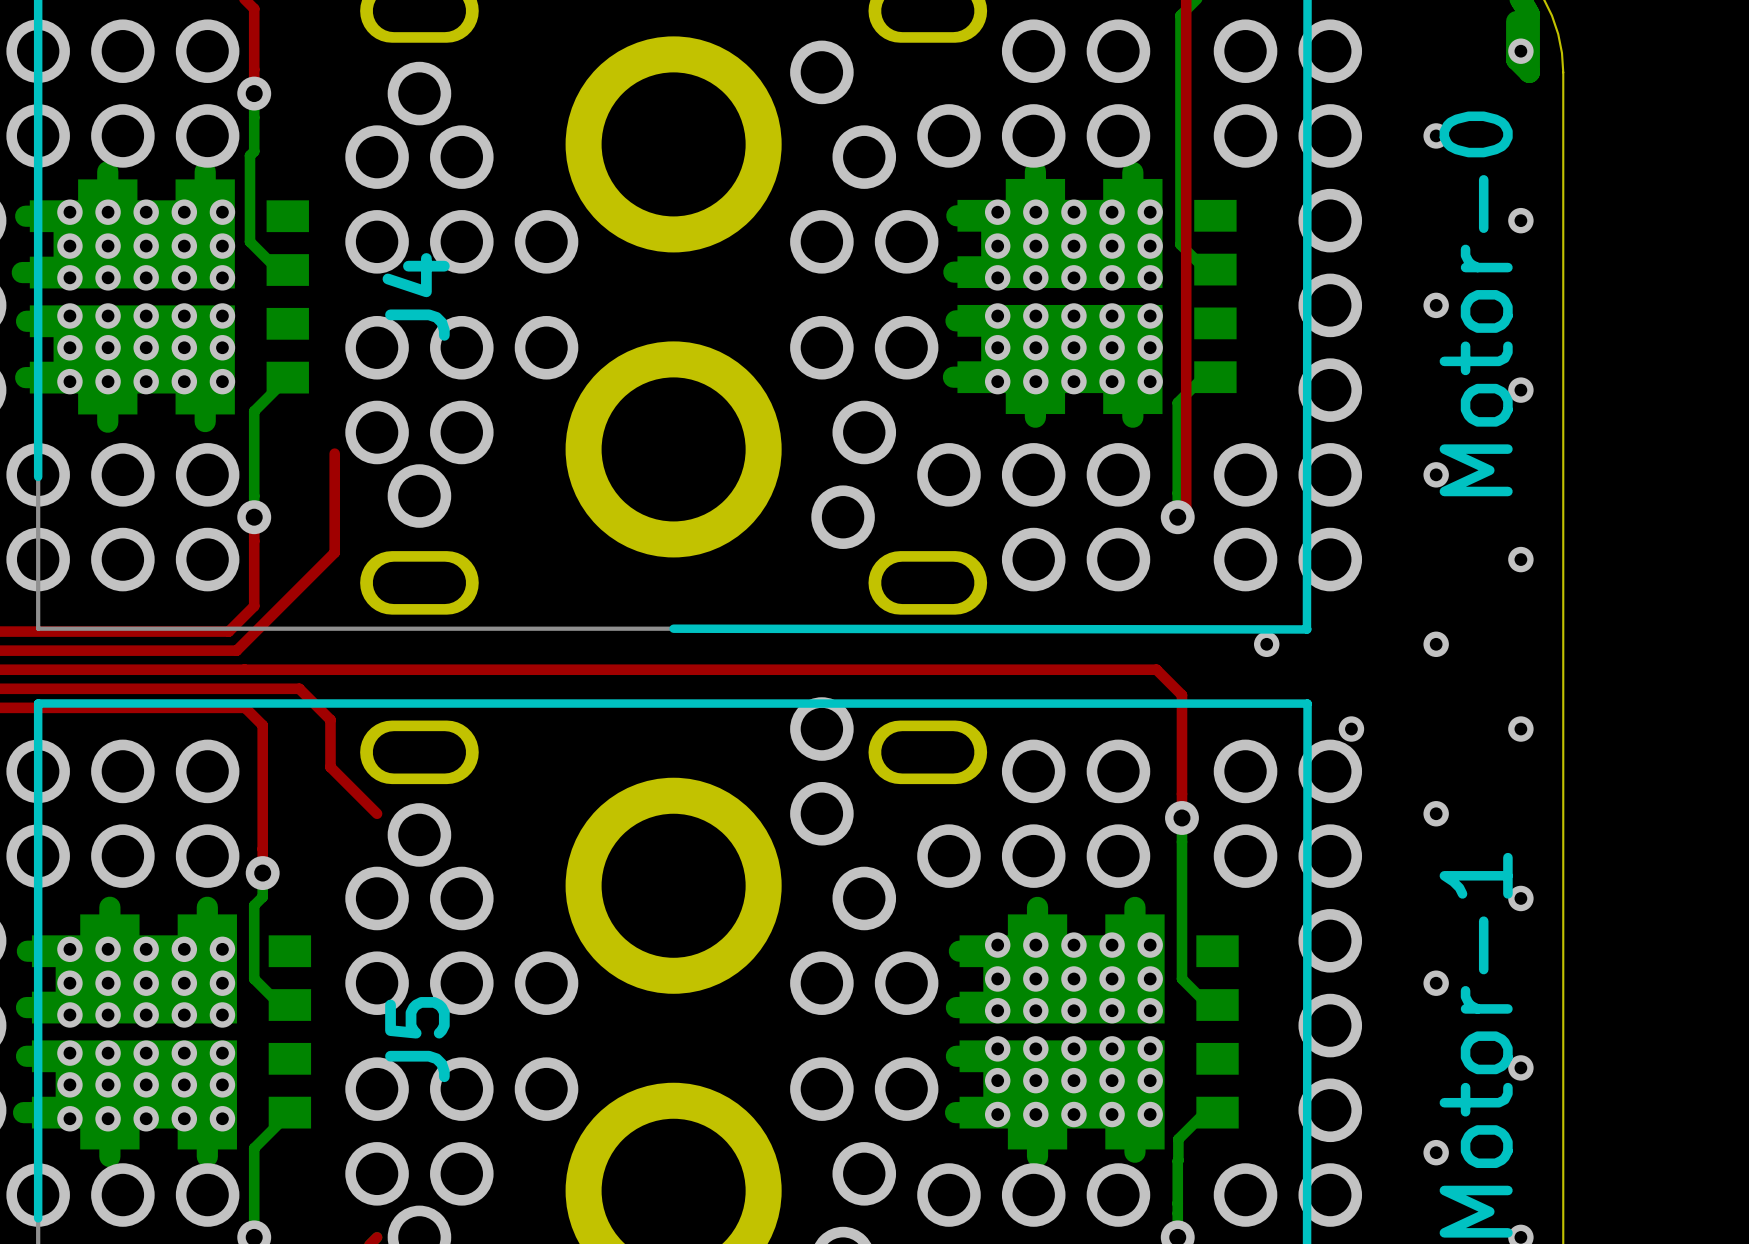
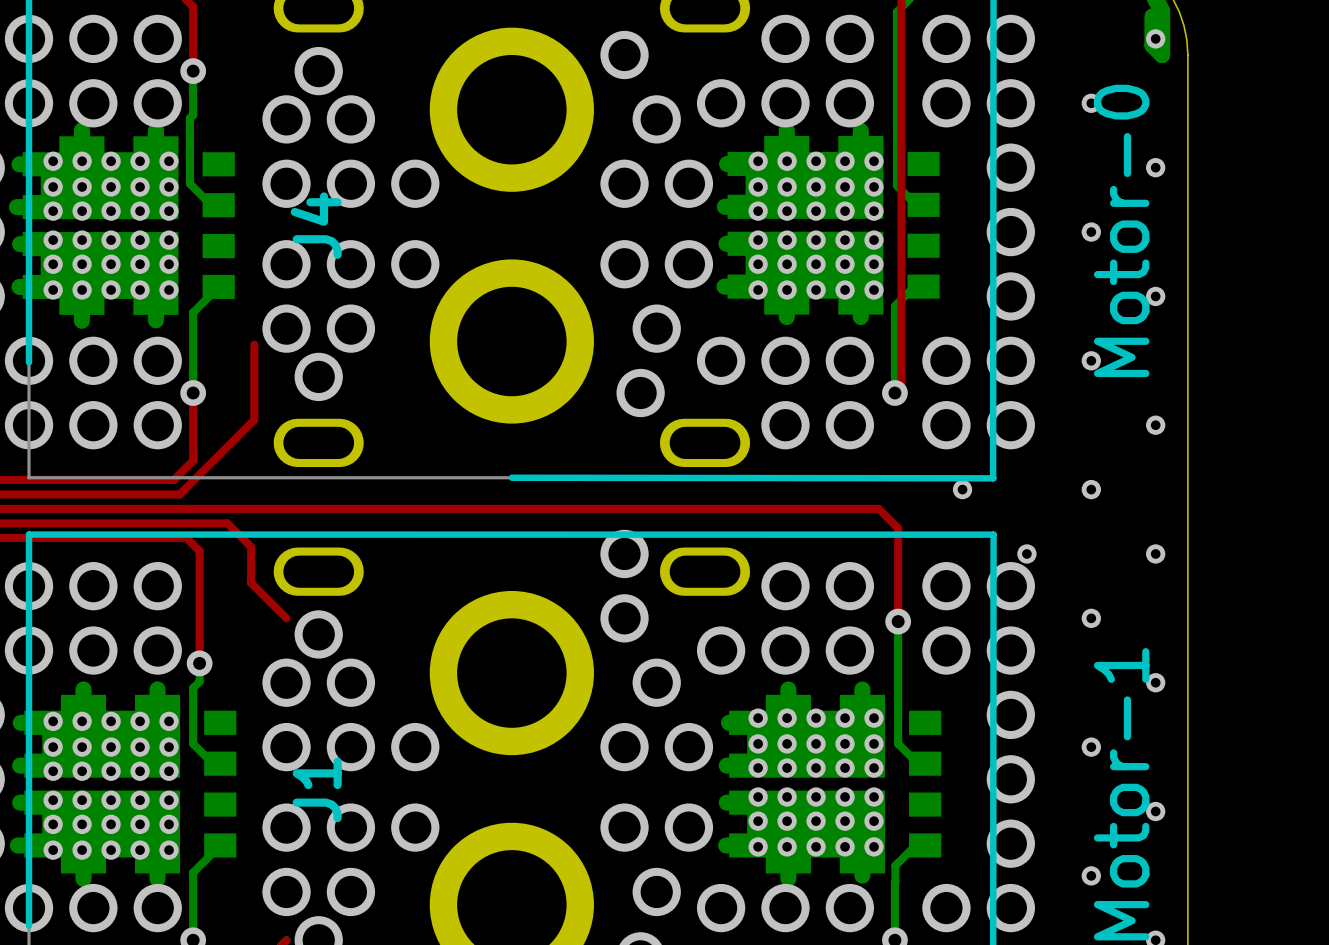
J5 name: J5 (417, 1039) -> J1 (317, 789)

